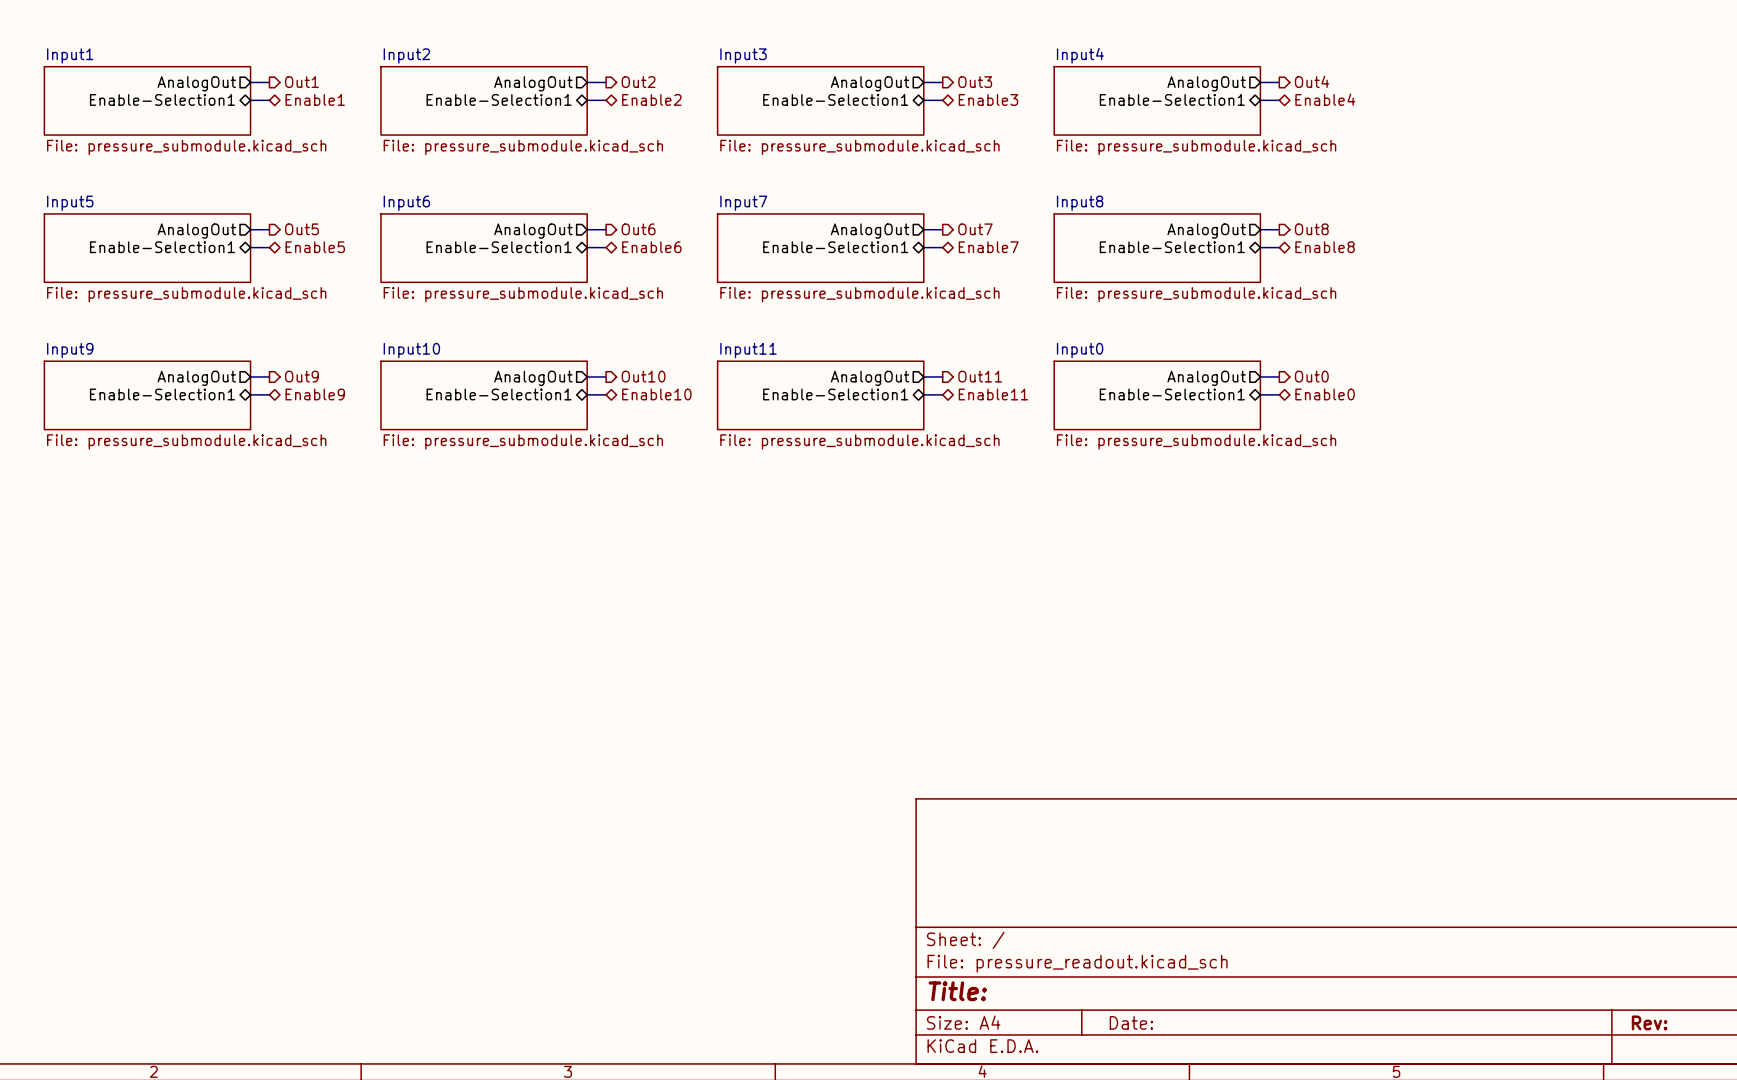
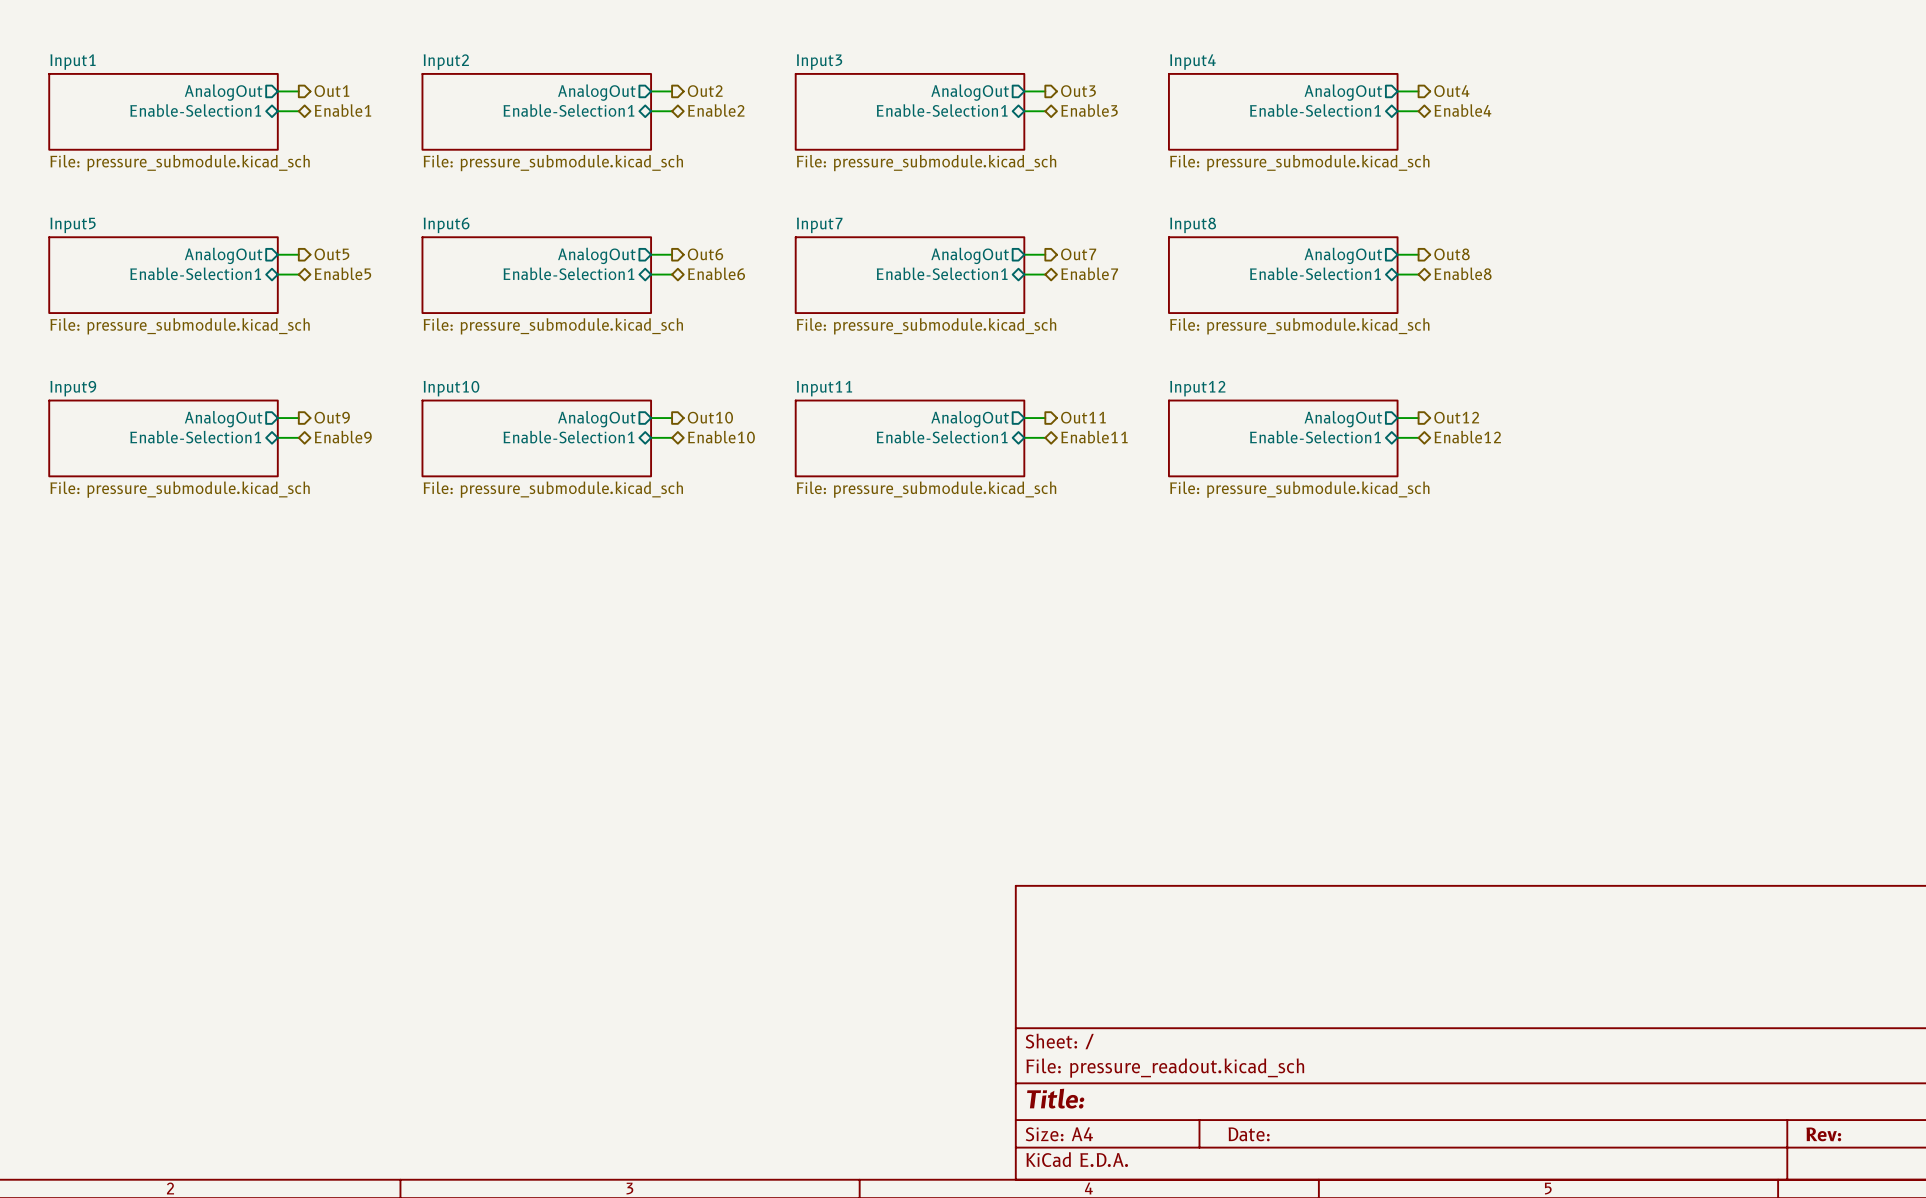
sheet Input0 name: Input0 (1080, 350) -> Input12 (1197, 388)
hierarchical label: Out0 (1311, 376) -> Out12 (1456, 417)
hierarchical label: Enable0 (1325, 394) -> Enable12 (1467, 437)

